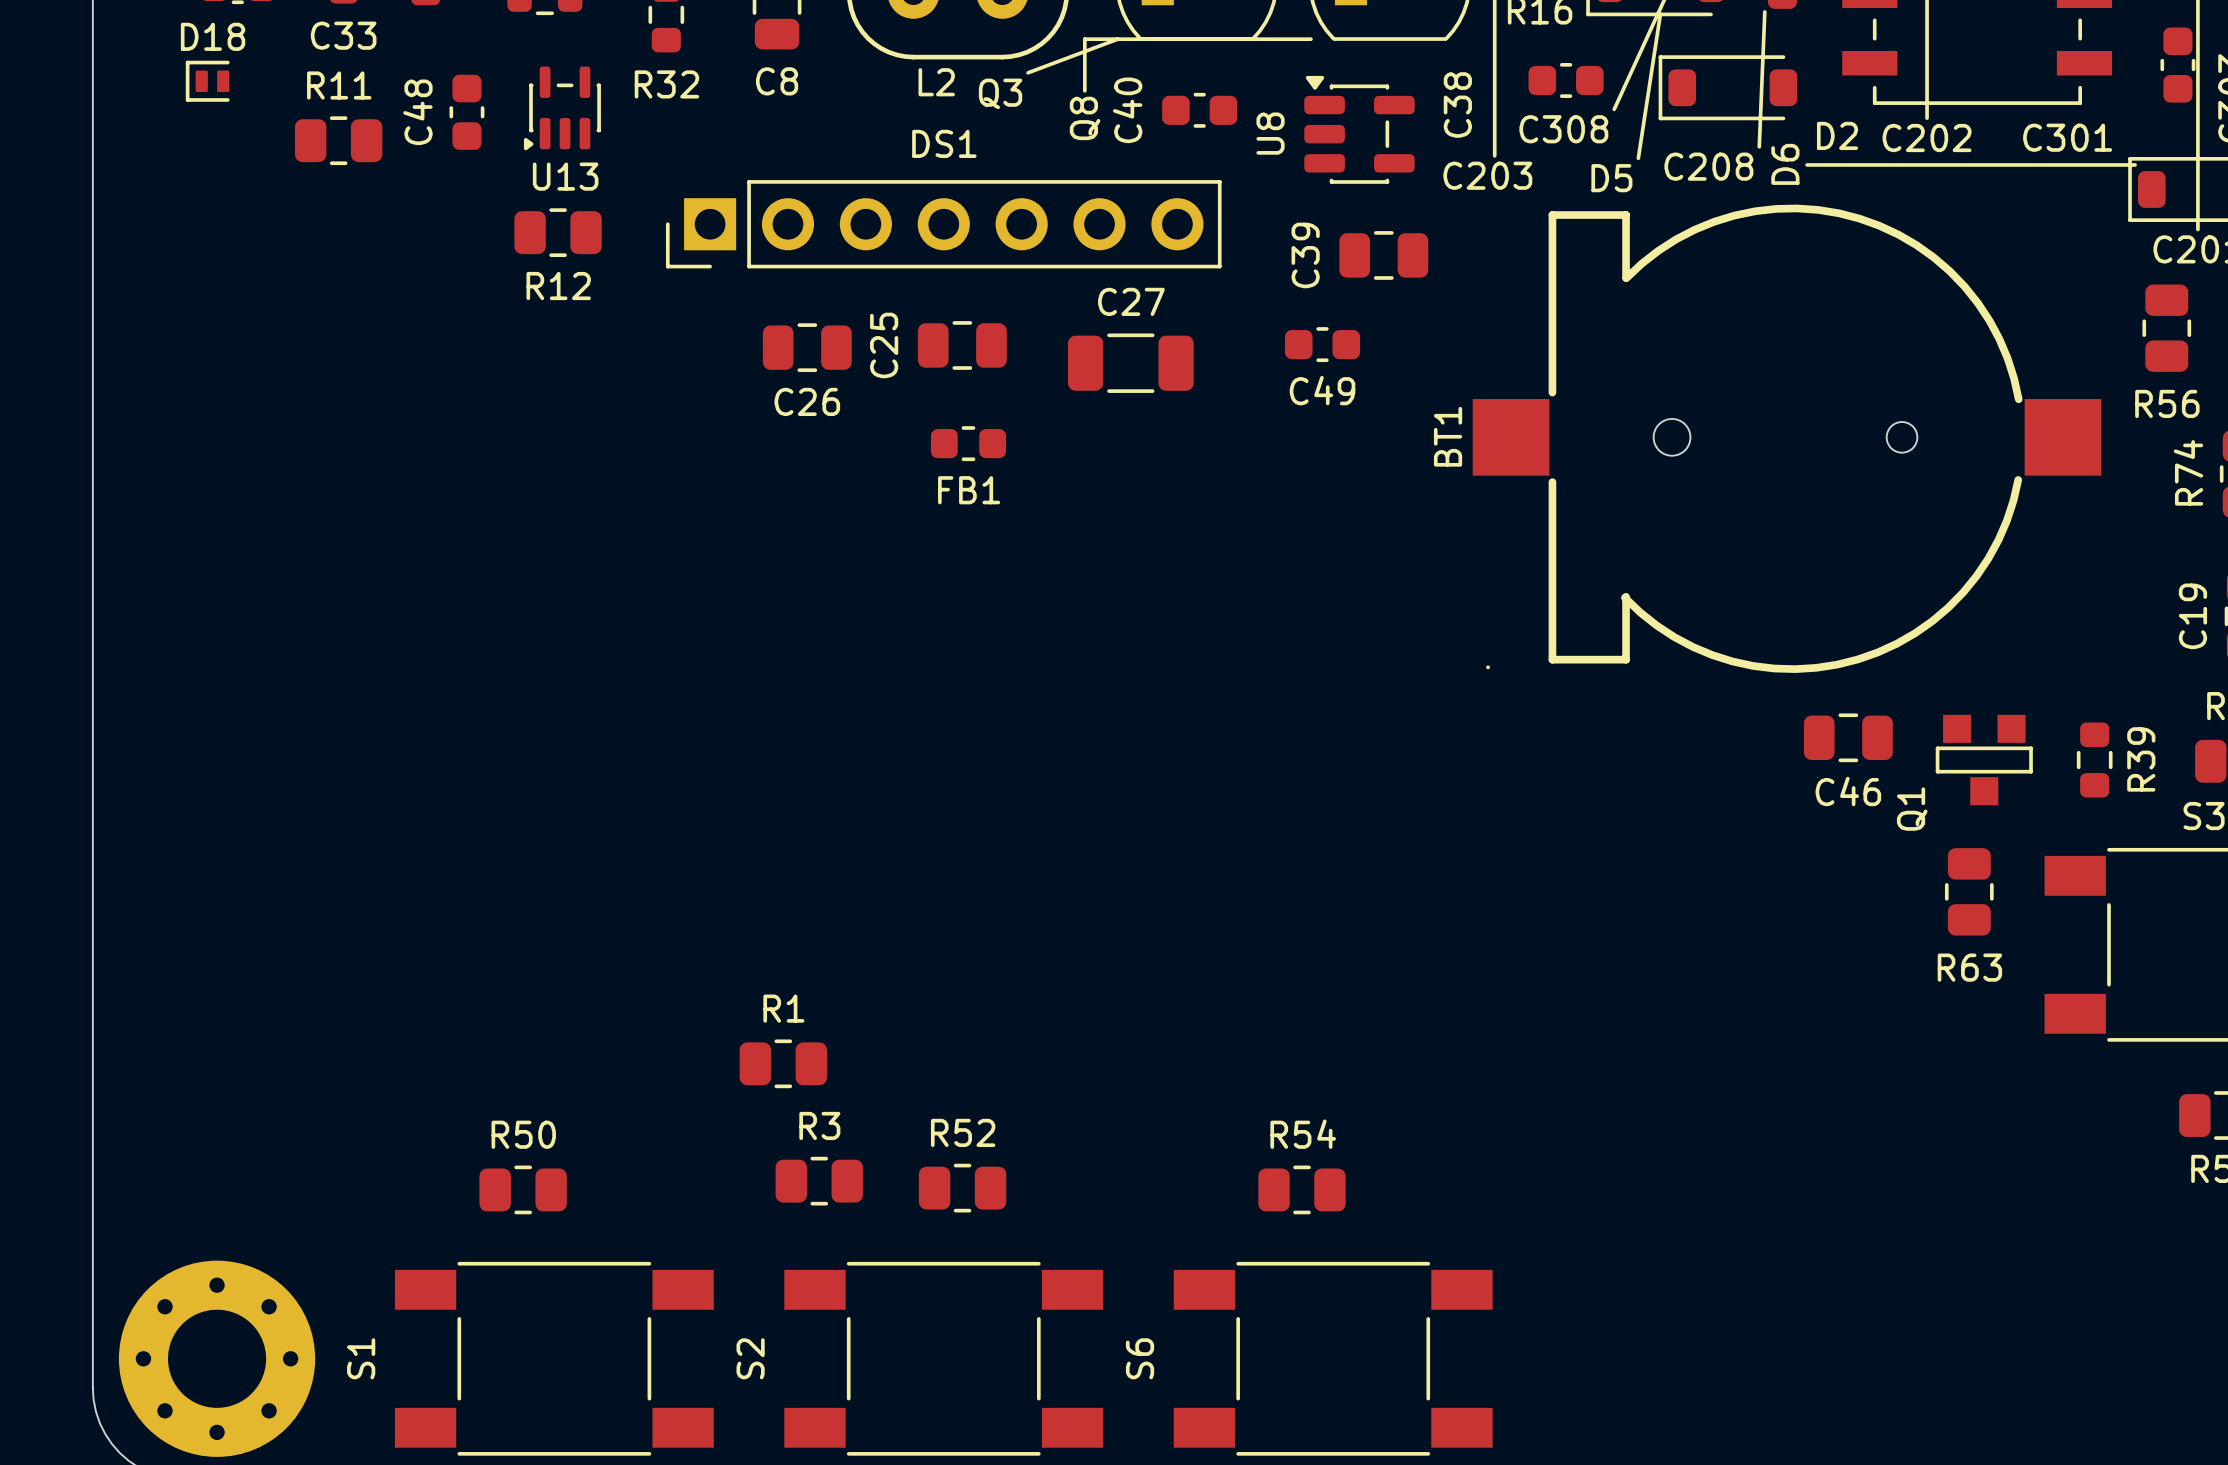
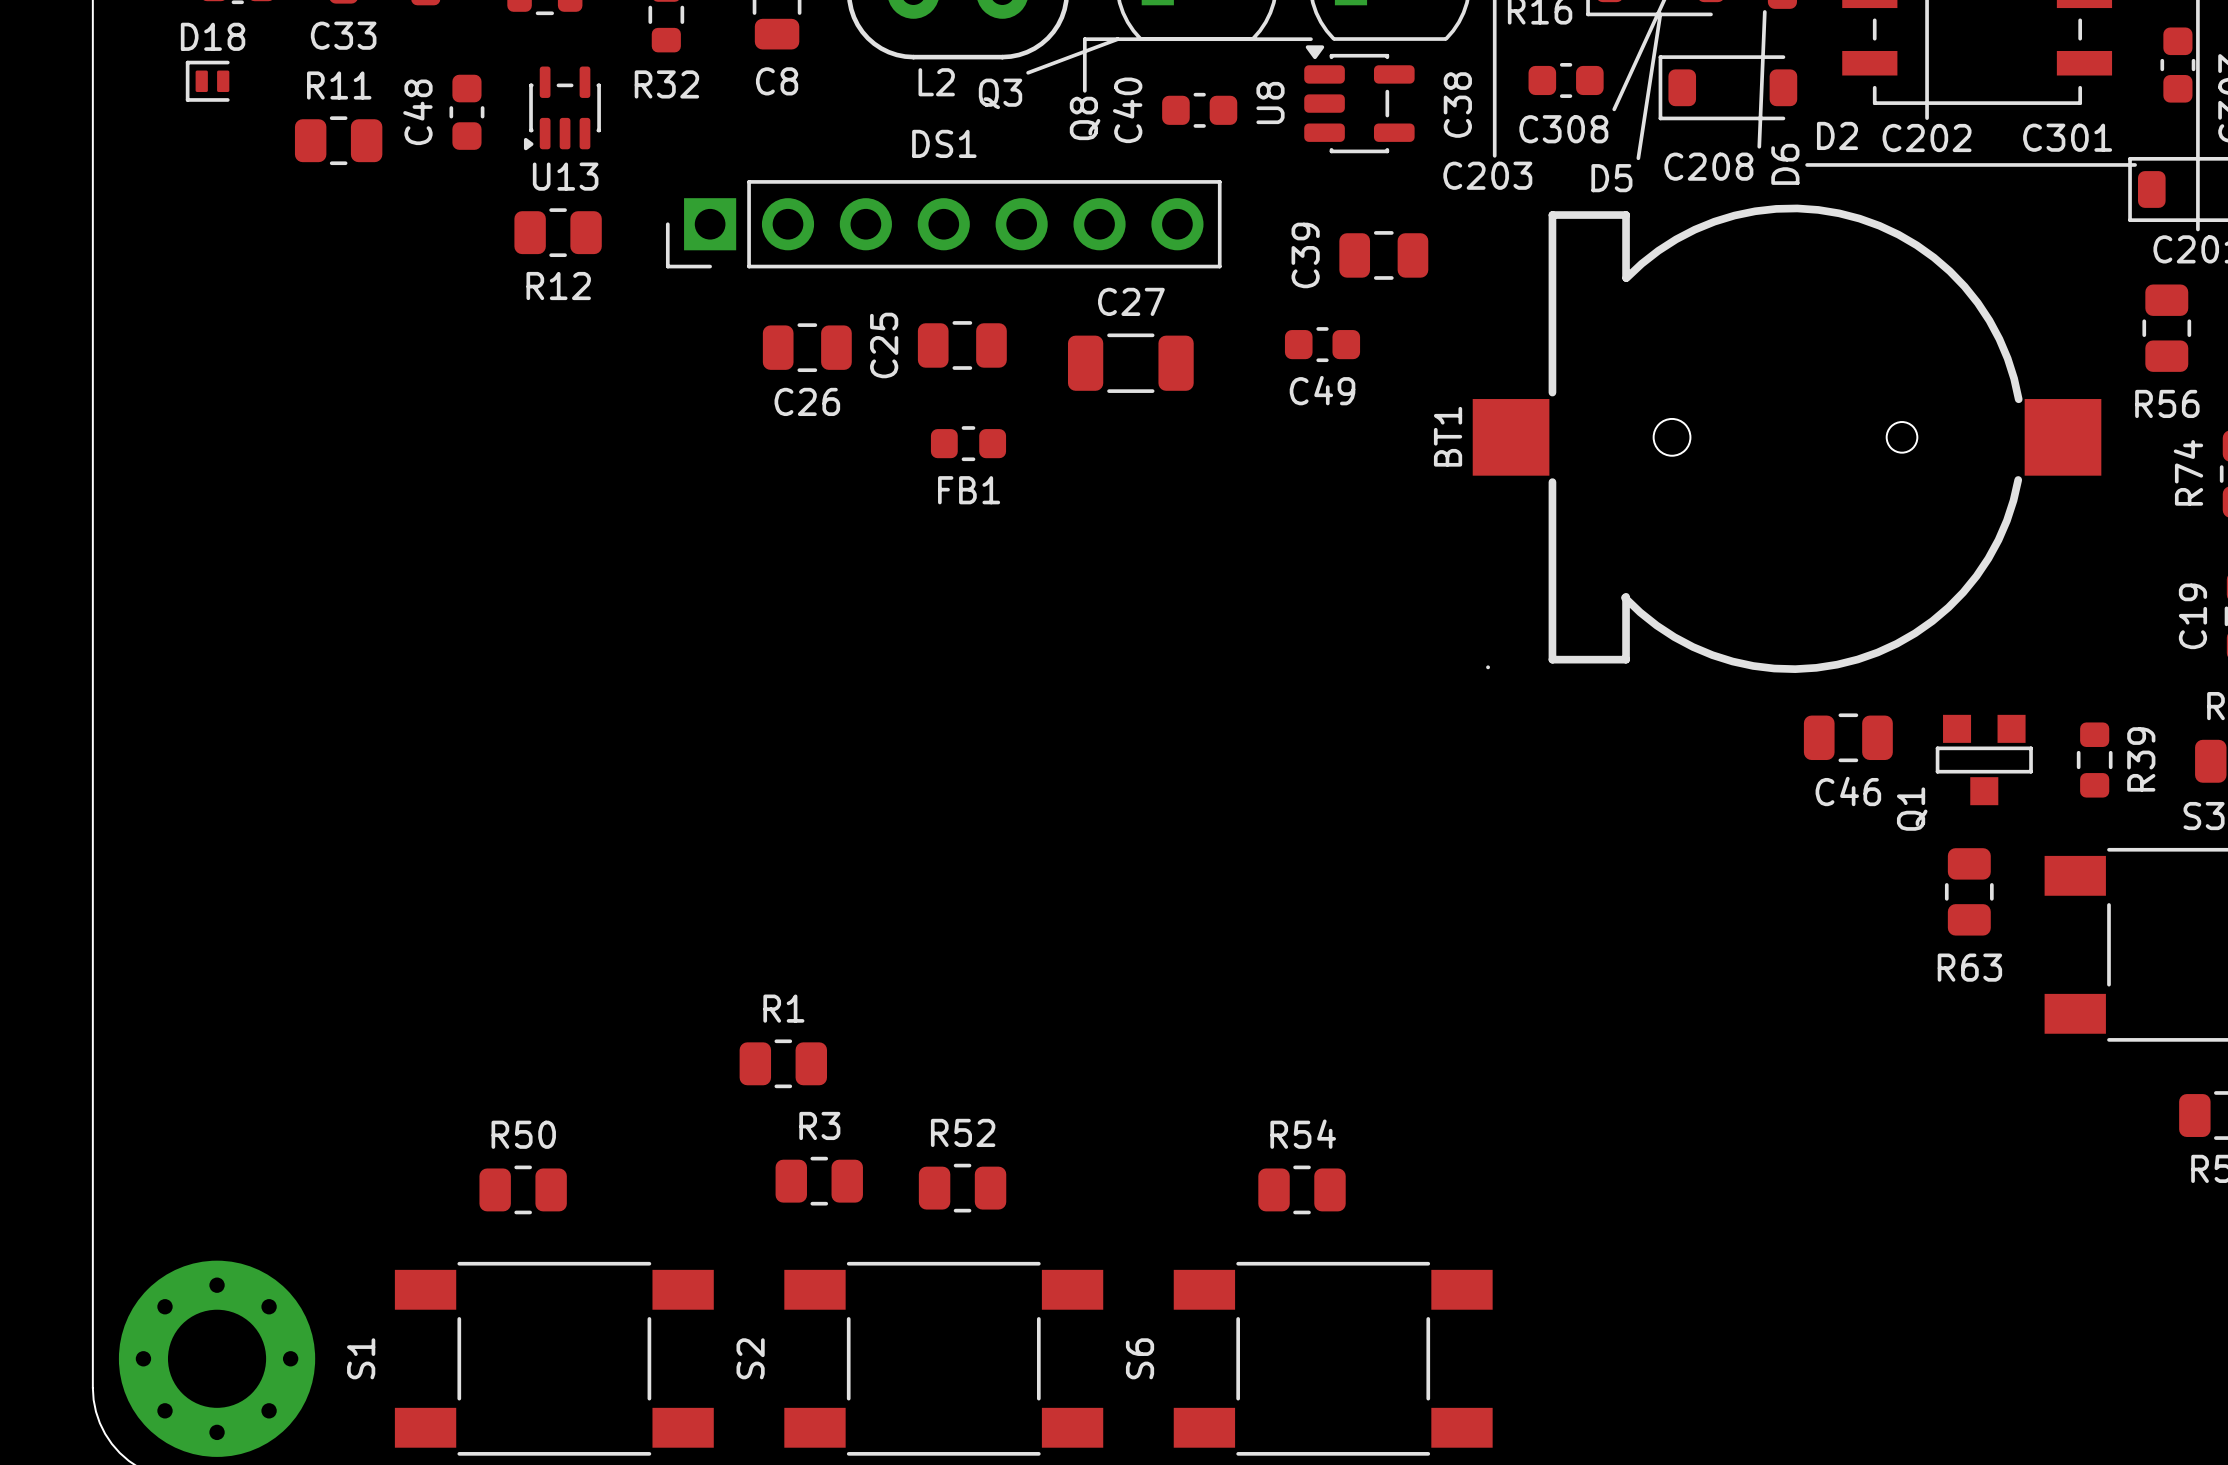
U8 position: (1359, 129) -> (1359, 99)

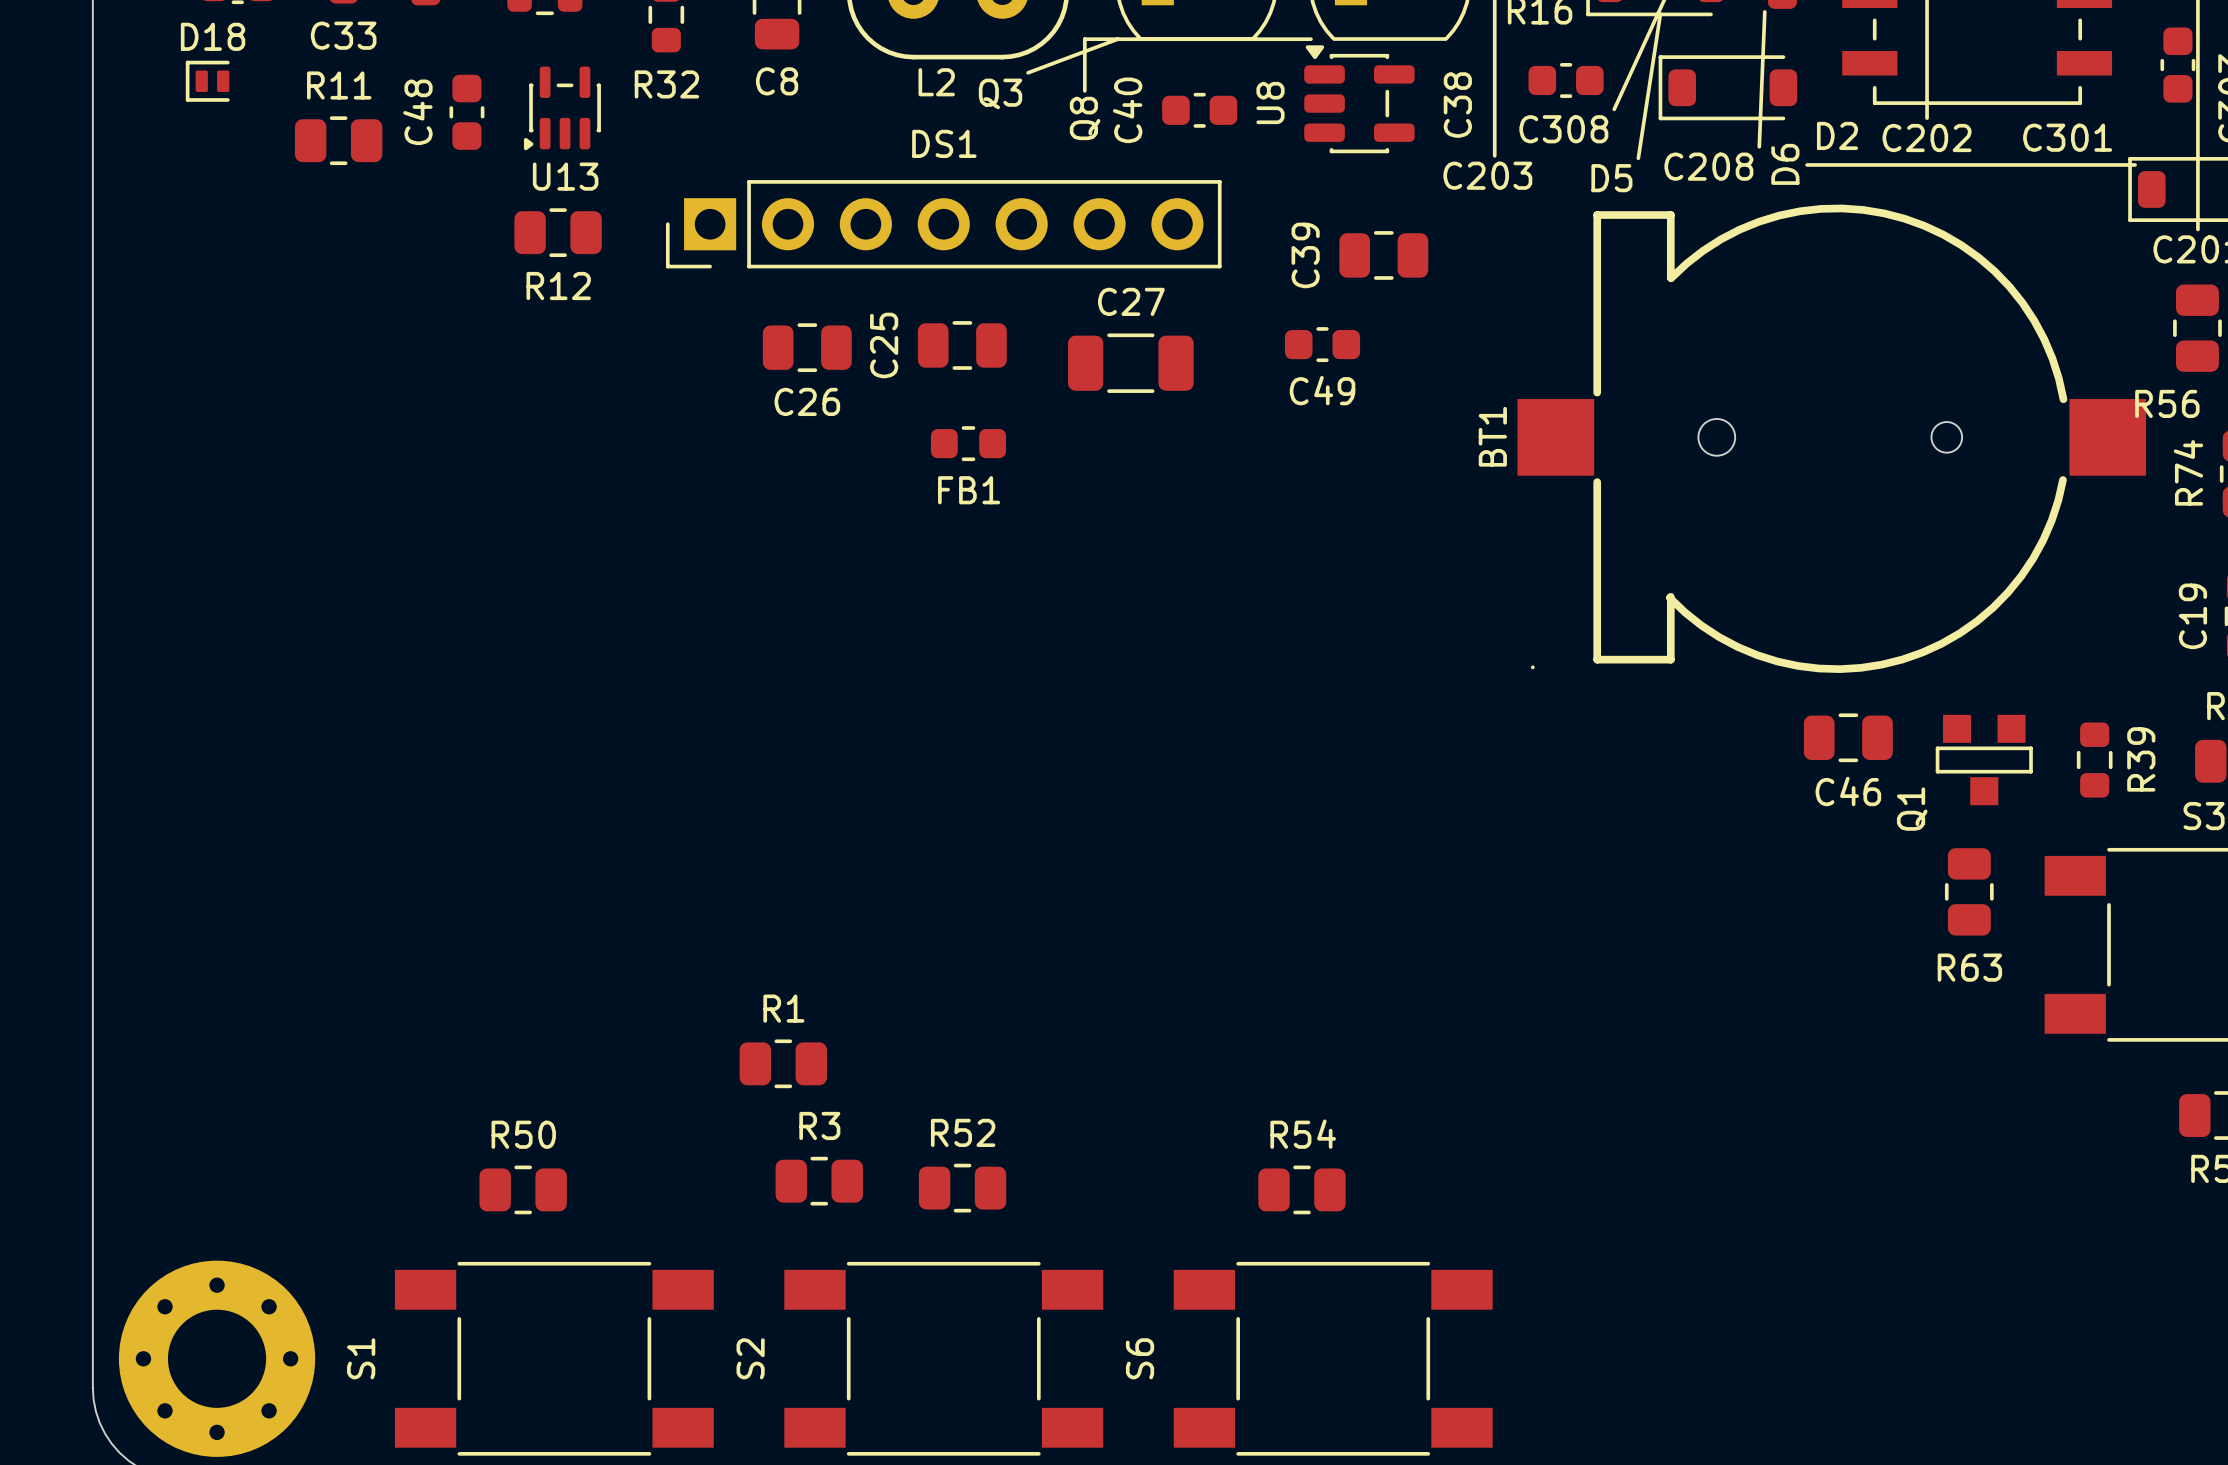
R56 position: (2166, 328) -> (2197, 328)
BT1 position: (1787, 438) -> (1831, 438)

